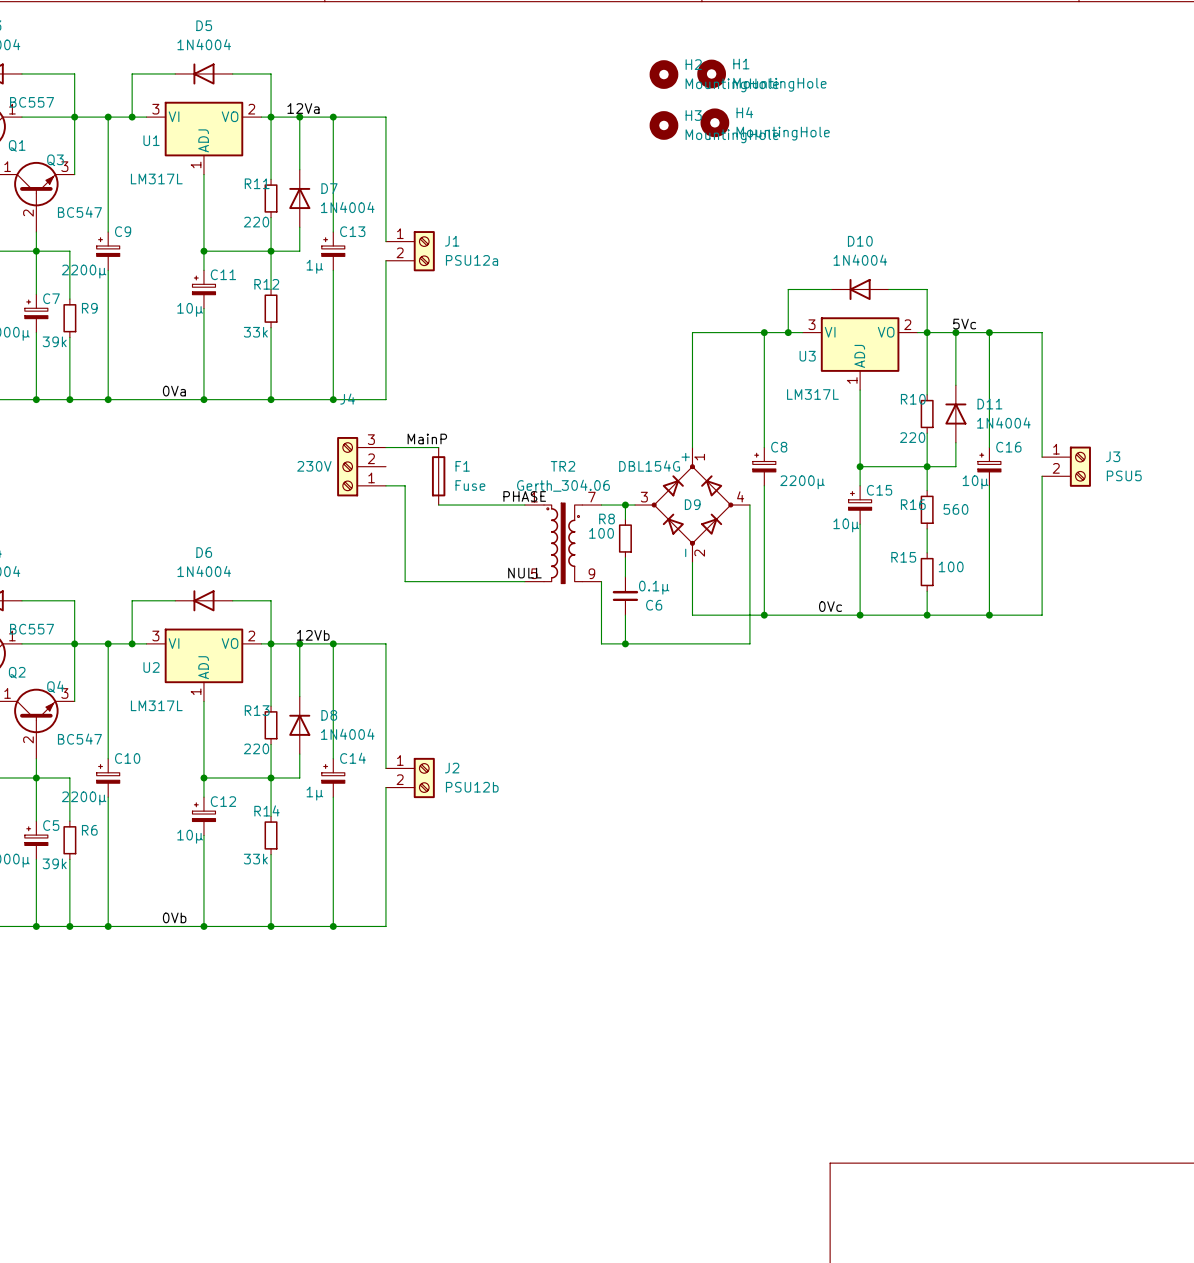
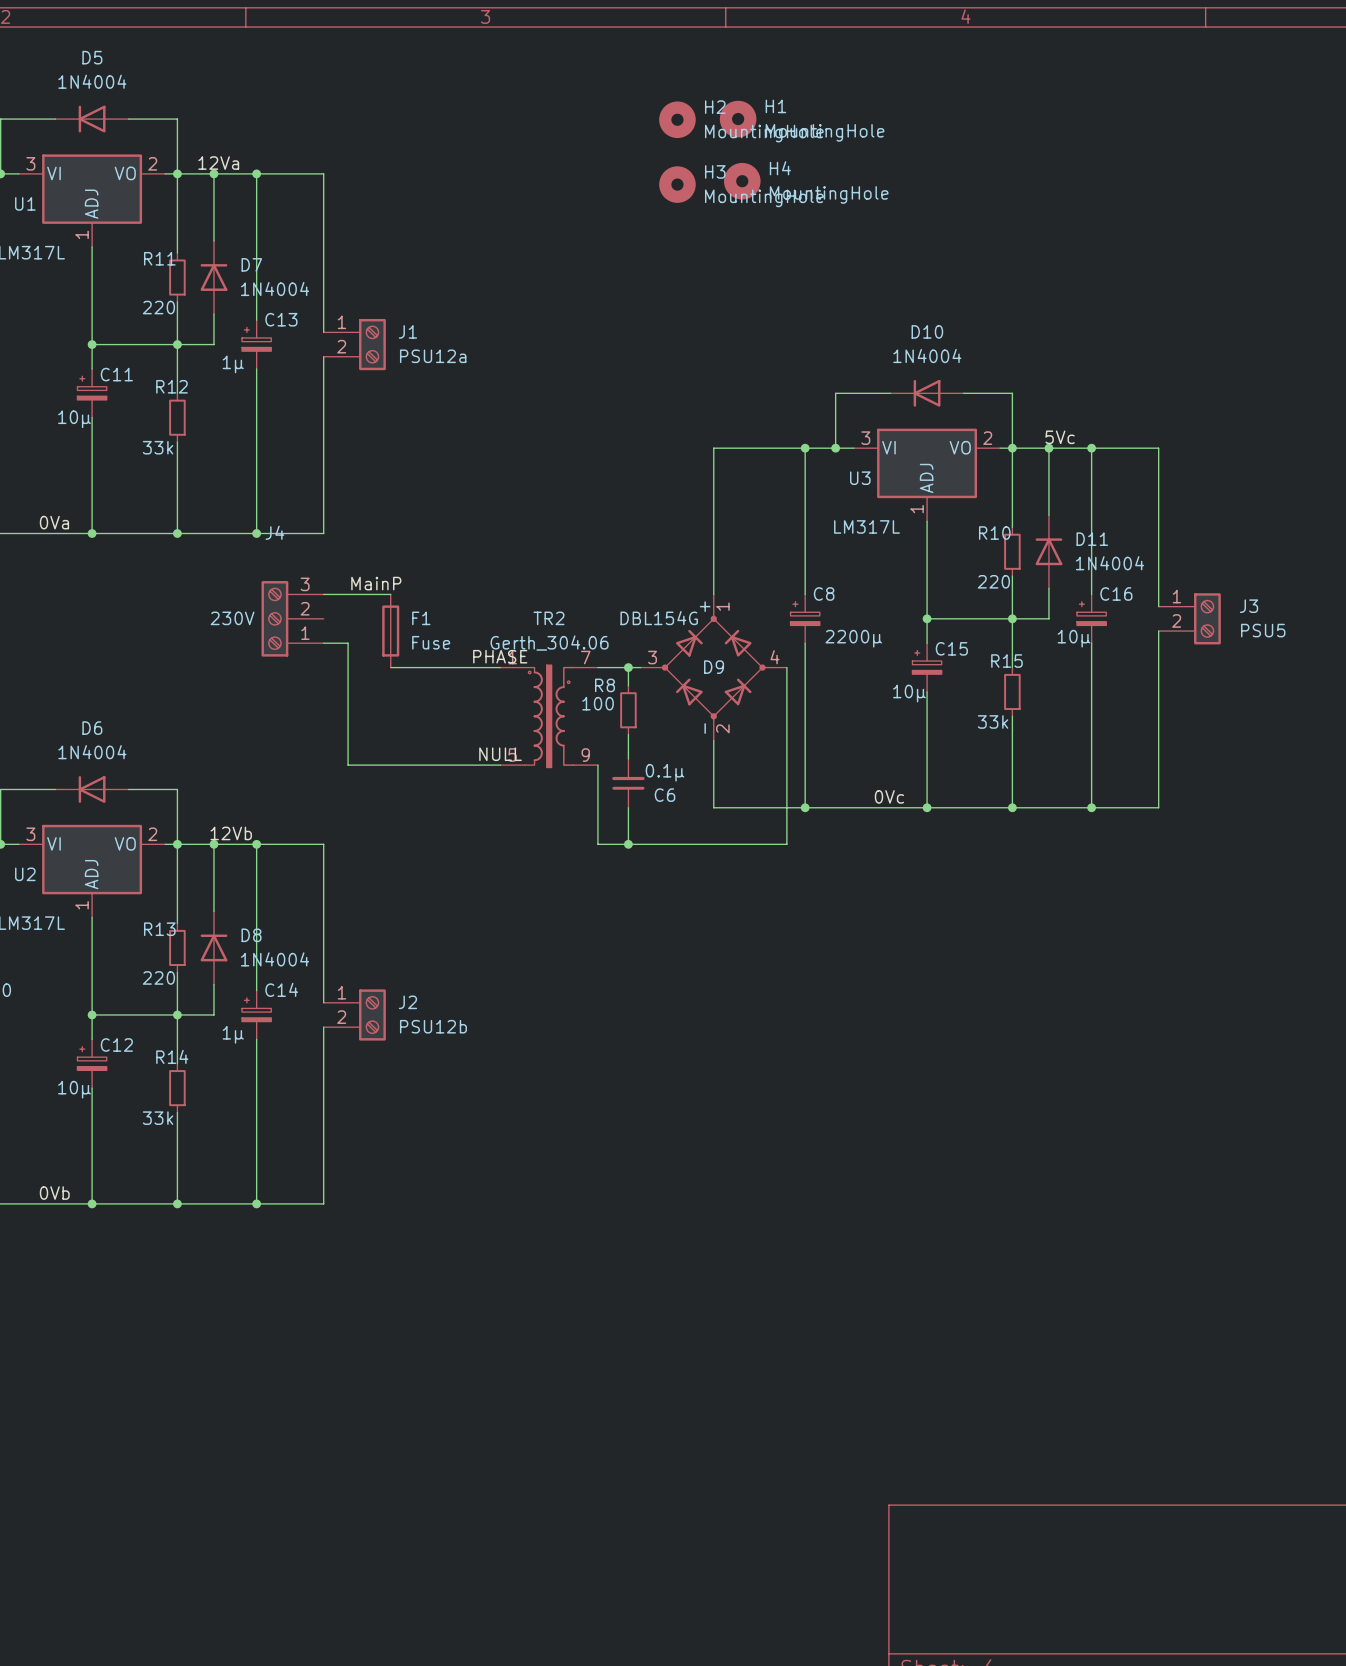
R16: 560 (927, 509) -> none
wire: (927, 528) (927, 543) -> (1012, 649) (1012, 667)
wire: none -> (1012, 728) (1012, 777)
R15 name position: R15 (903, 557) -> R15 (1006, 661)
R15 value: 100 (951, 566) -> 33k (993, 721)
R15 position: (927, 572) -> (1012, 691)

